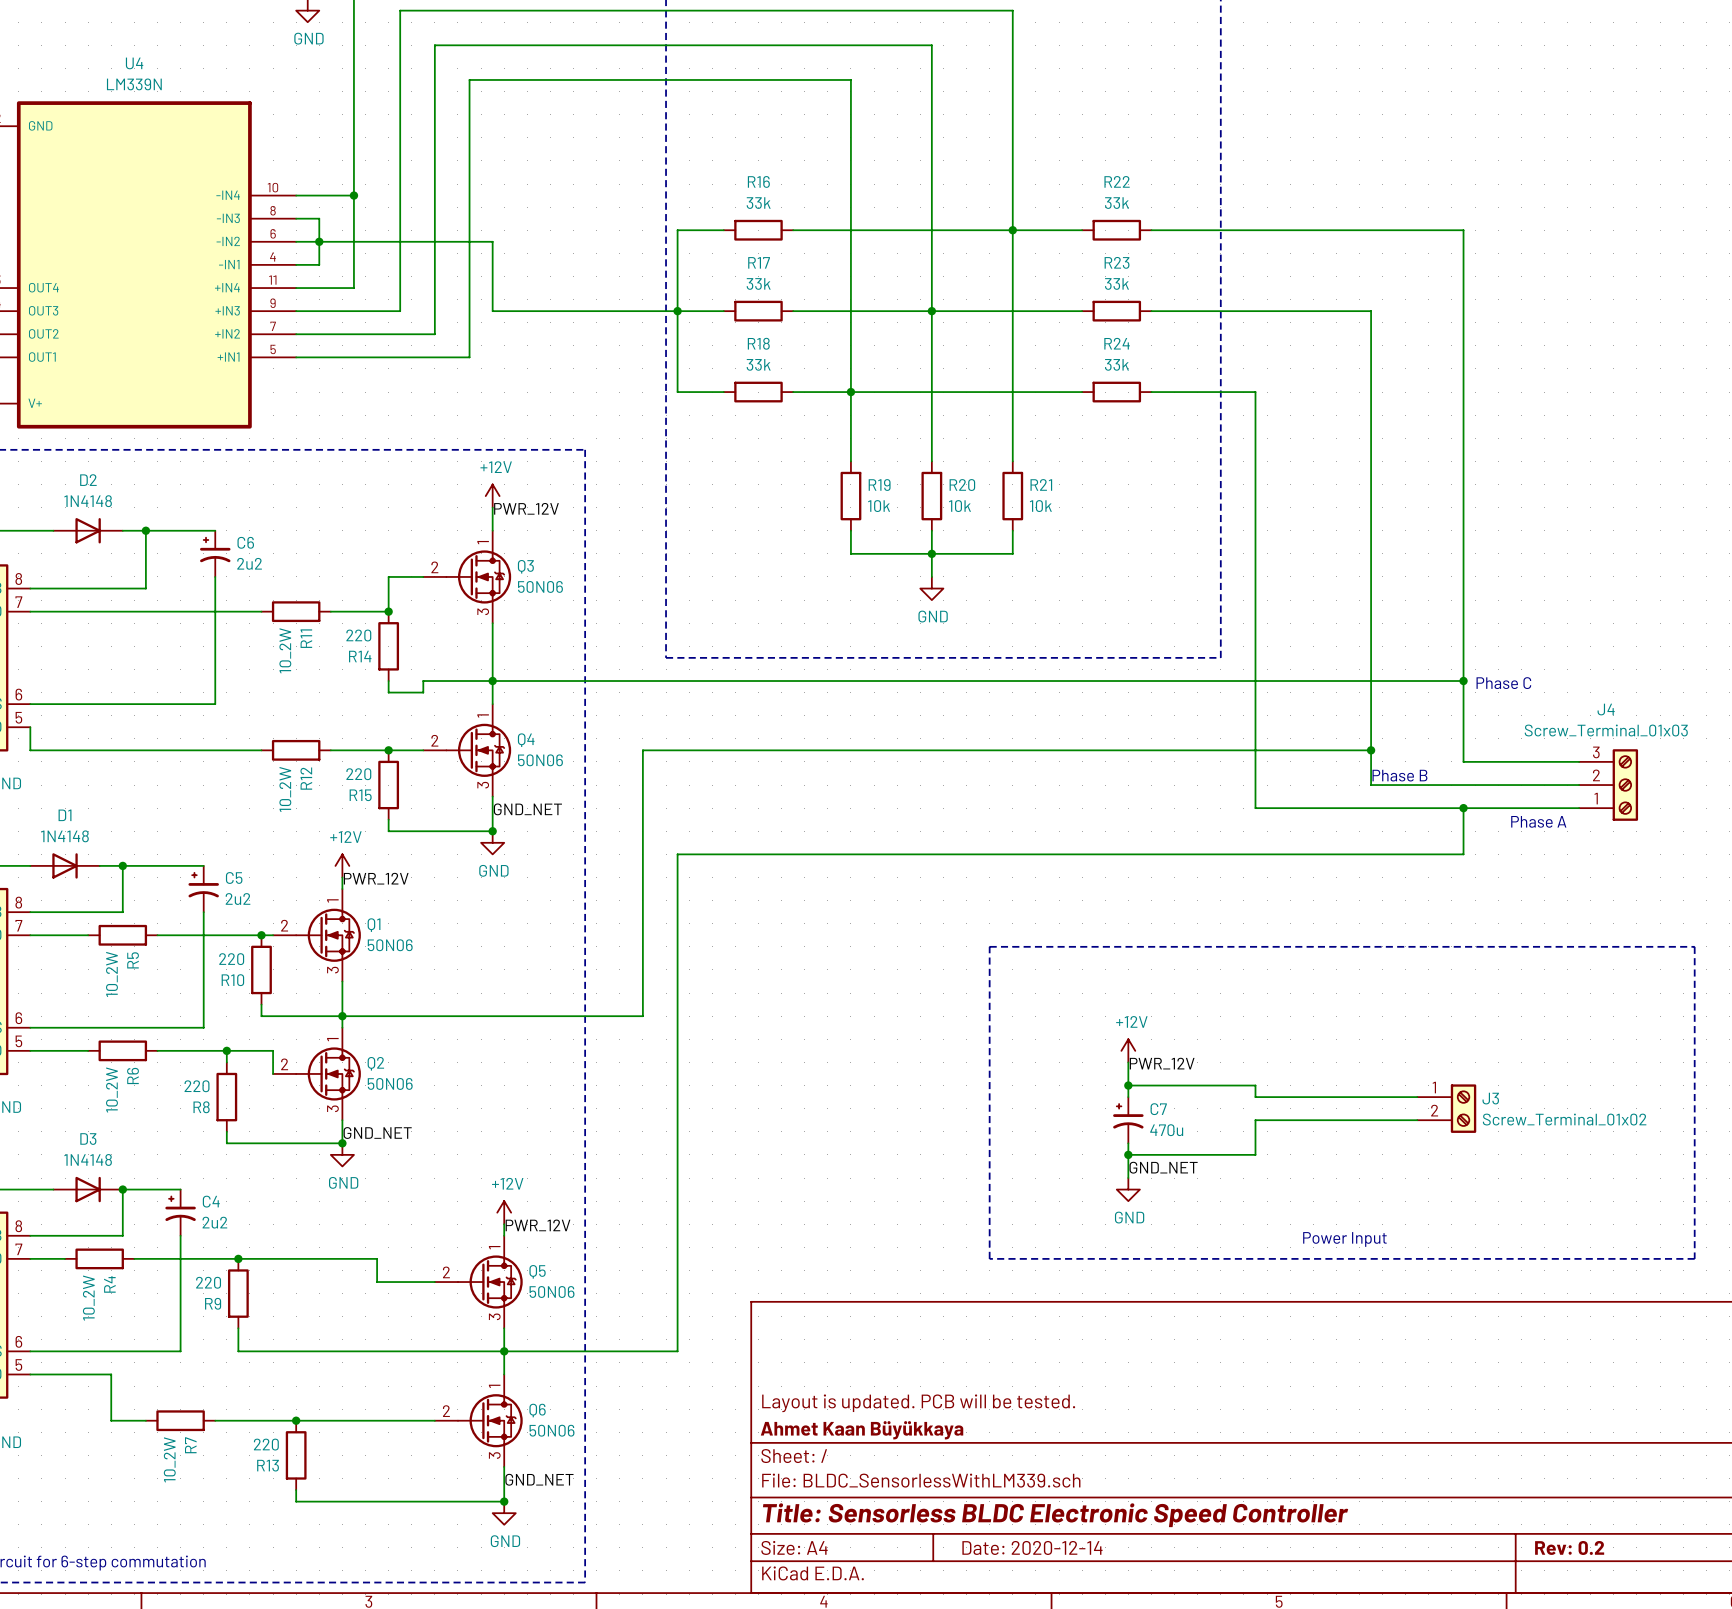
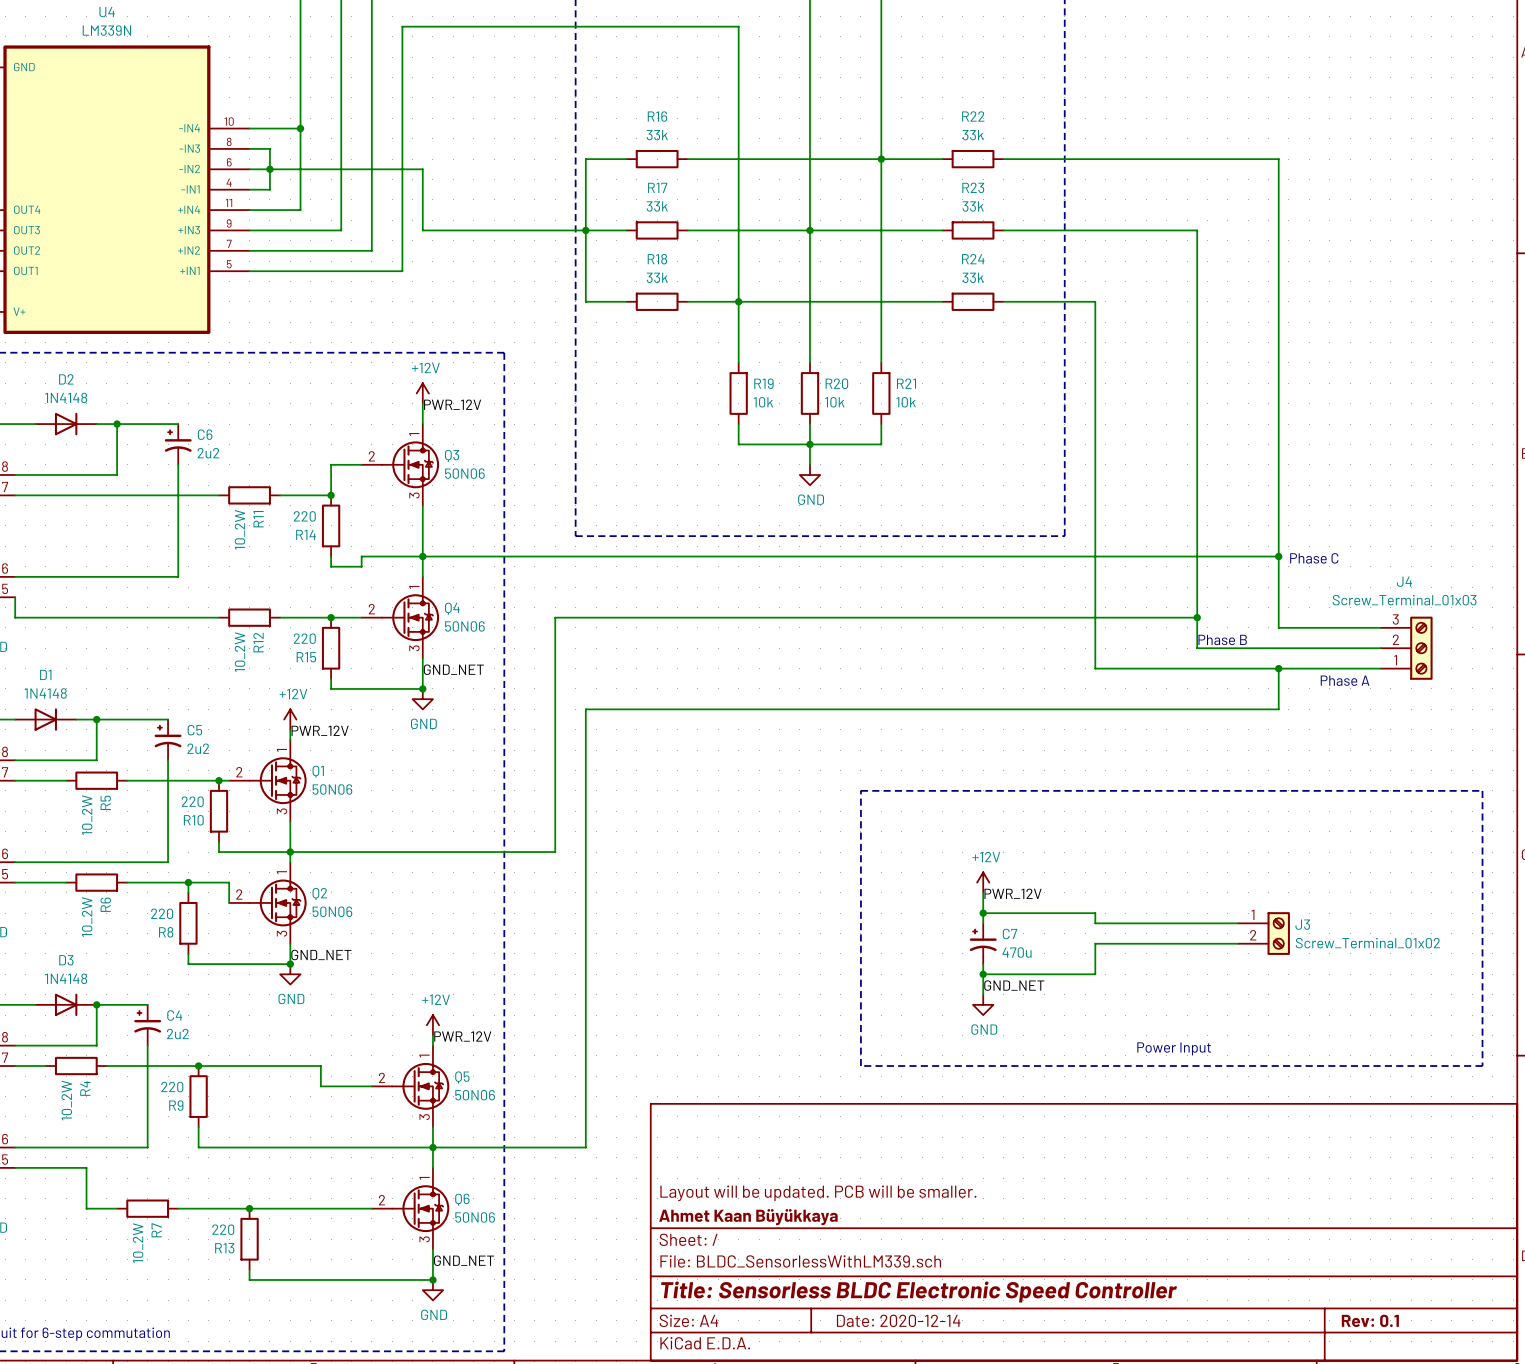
title block: Layout is updated. PCB will be tested. (918, 1403) -> Layout will be updated. PCB will be smaller. (818, 1193)
title block: Rev: 0.2 (1569, 1547) -> Rev: 0.1 (1370, 1320)

